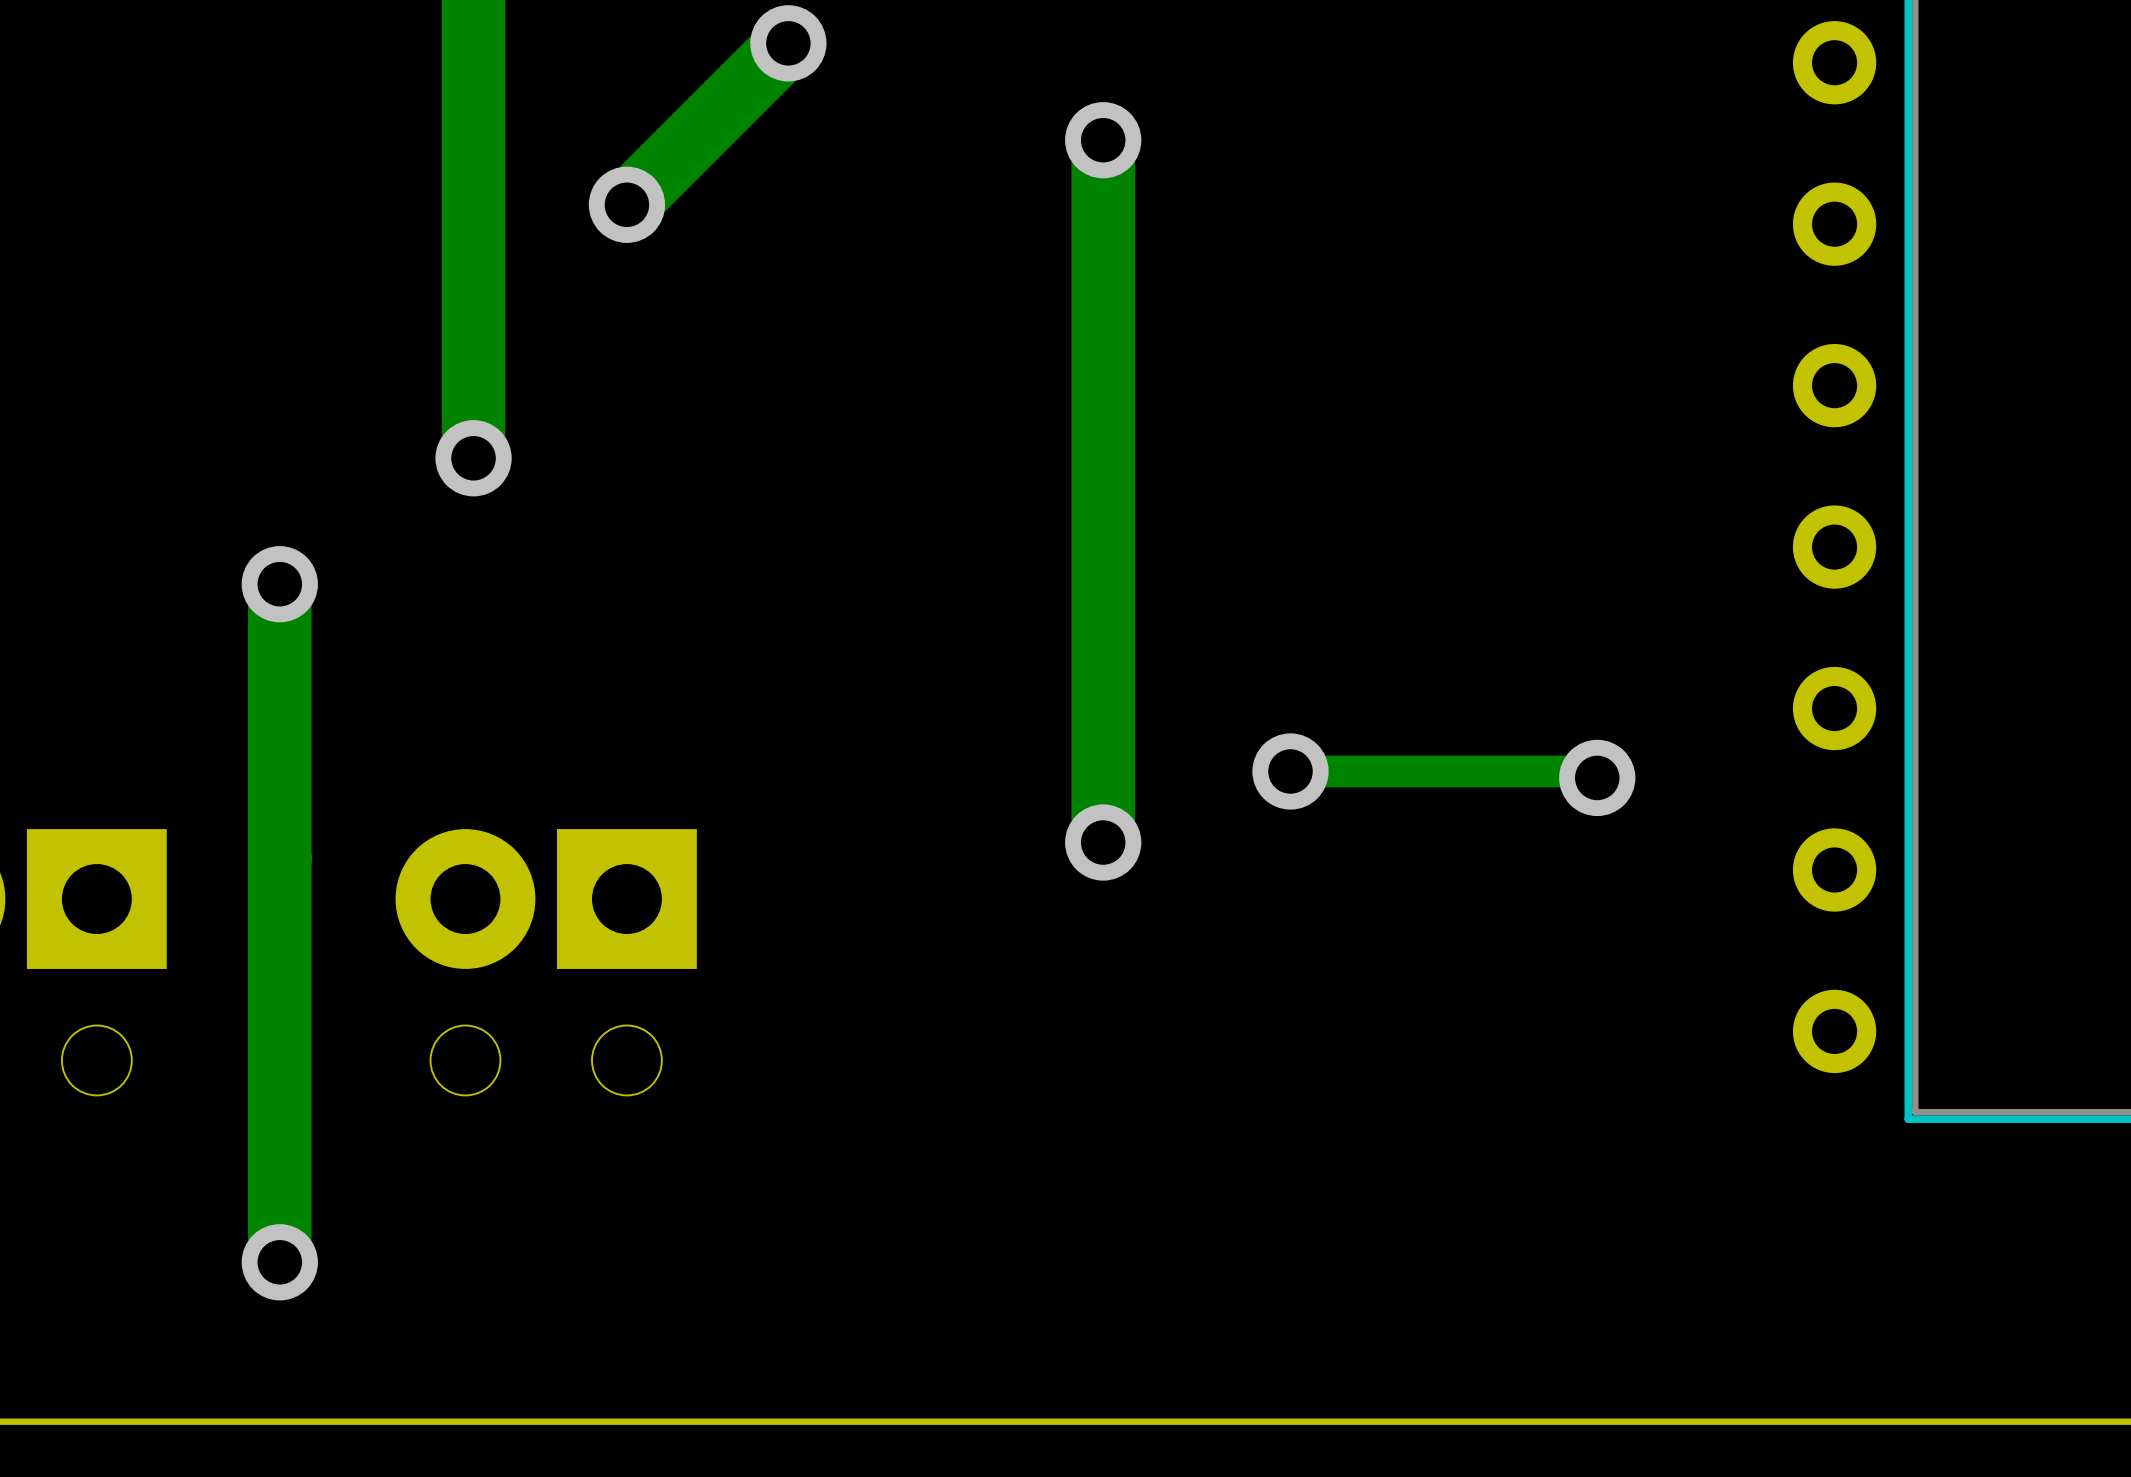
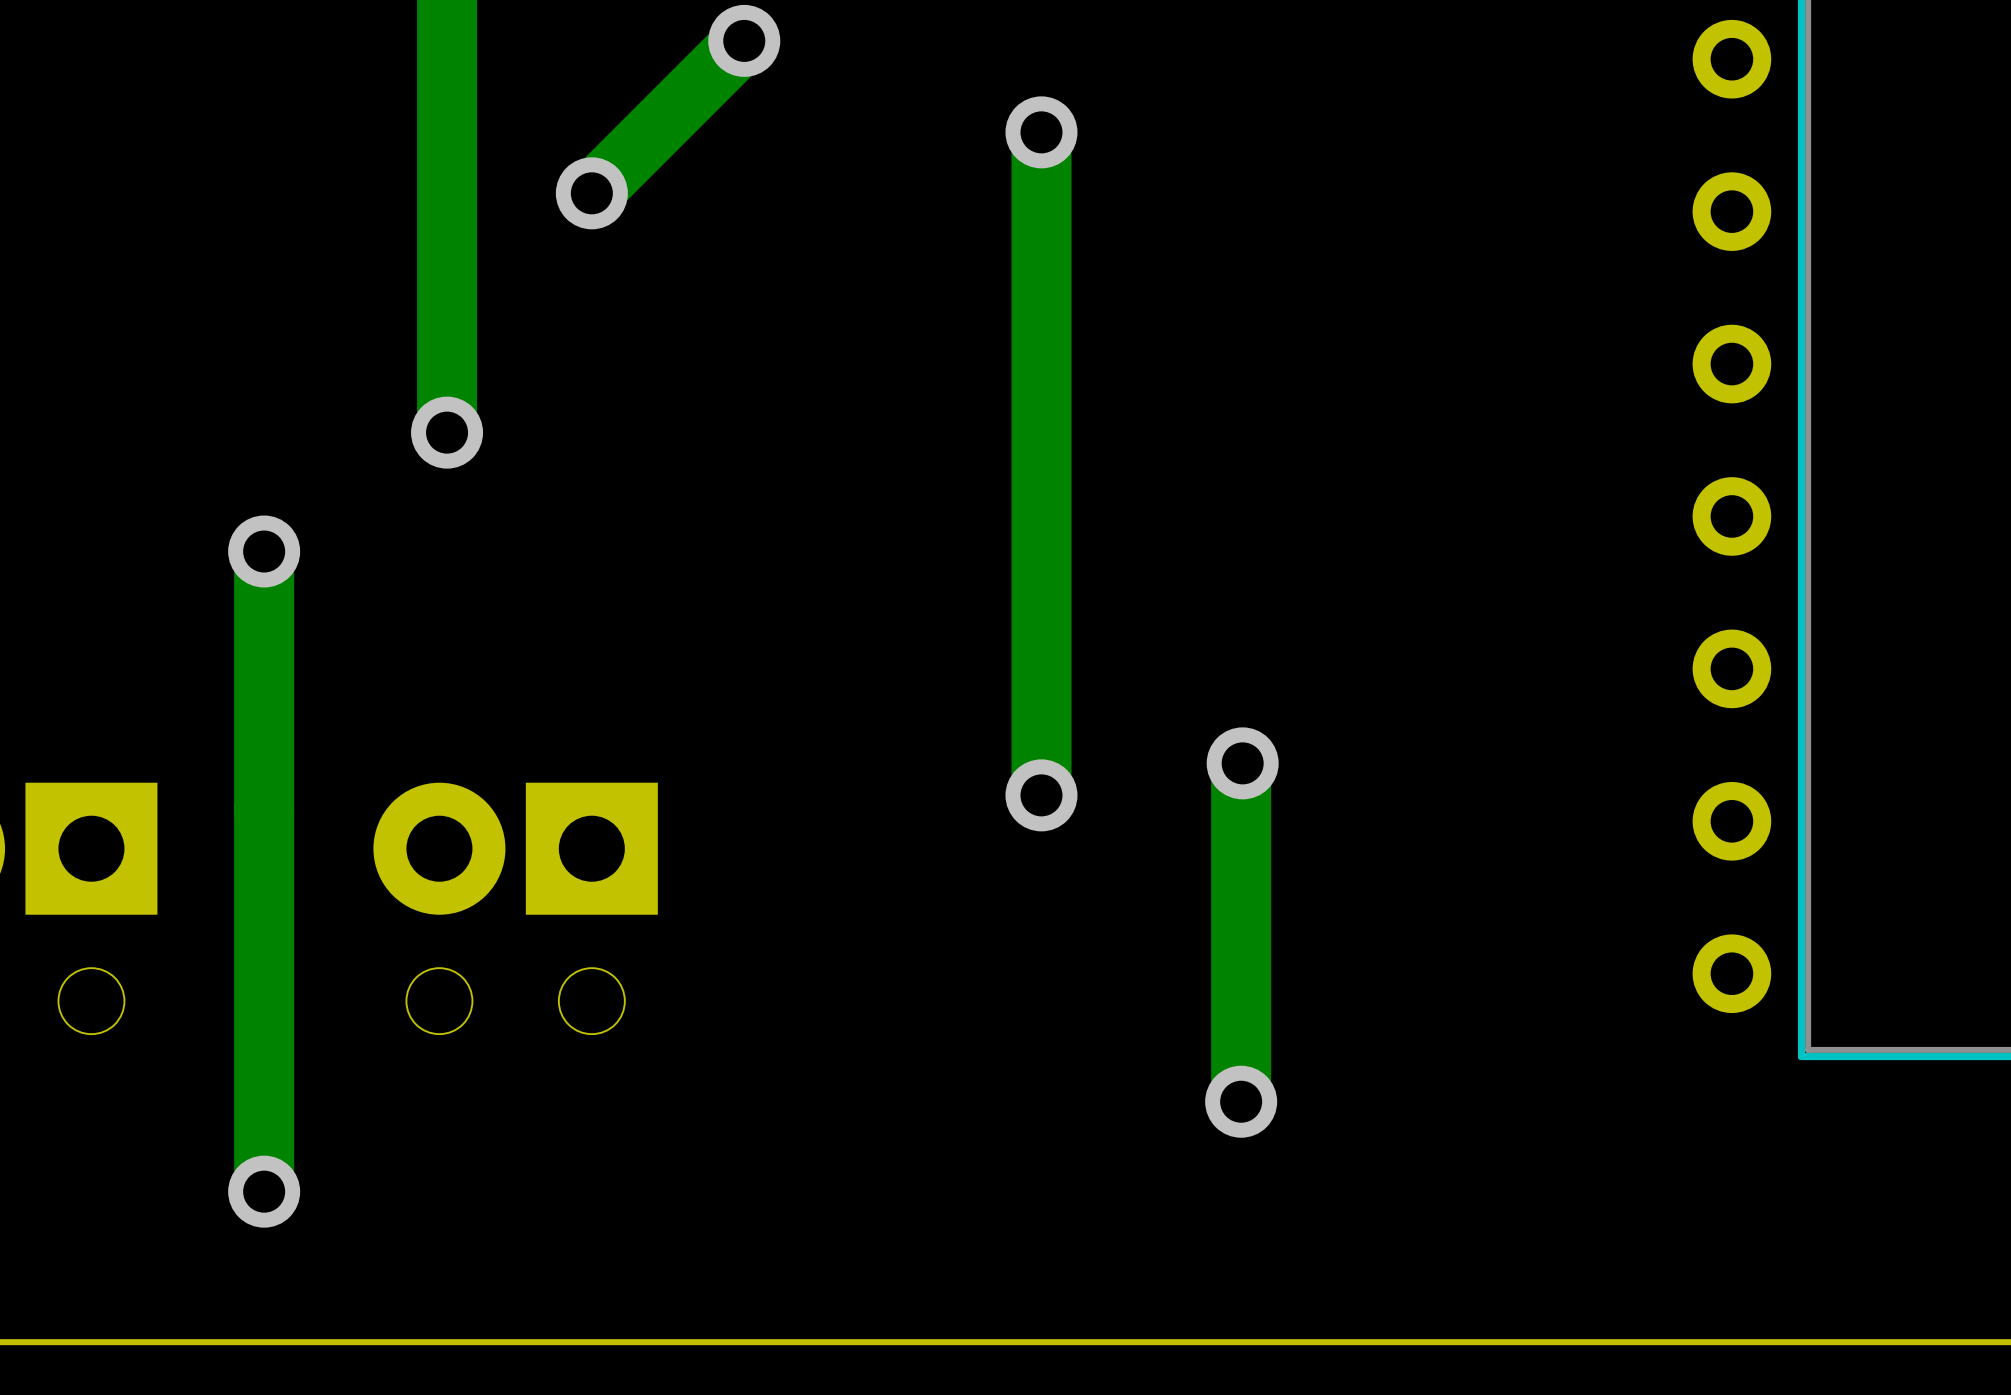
track: (1290, 771) (1590, 771) (1597, 777) -> none
via position: (1290, 771) -> (1242, 763)
via: (1597, 777) -> none
track: none -> (1242, 763) (1241, 764) (1241, 1101)
via: none -> (1241, 1101)

